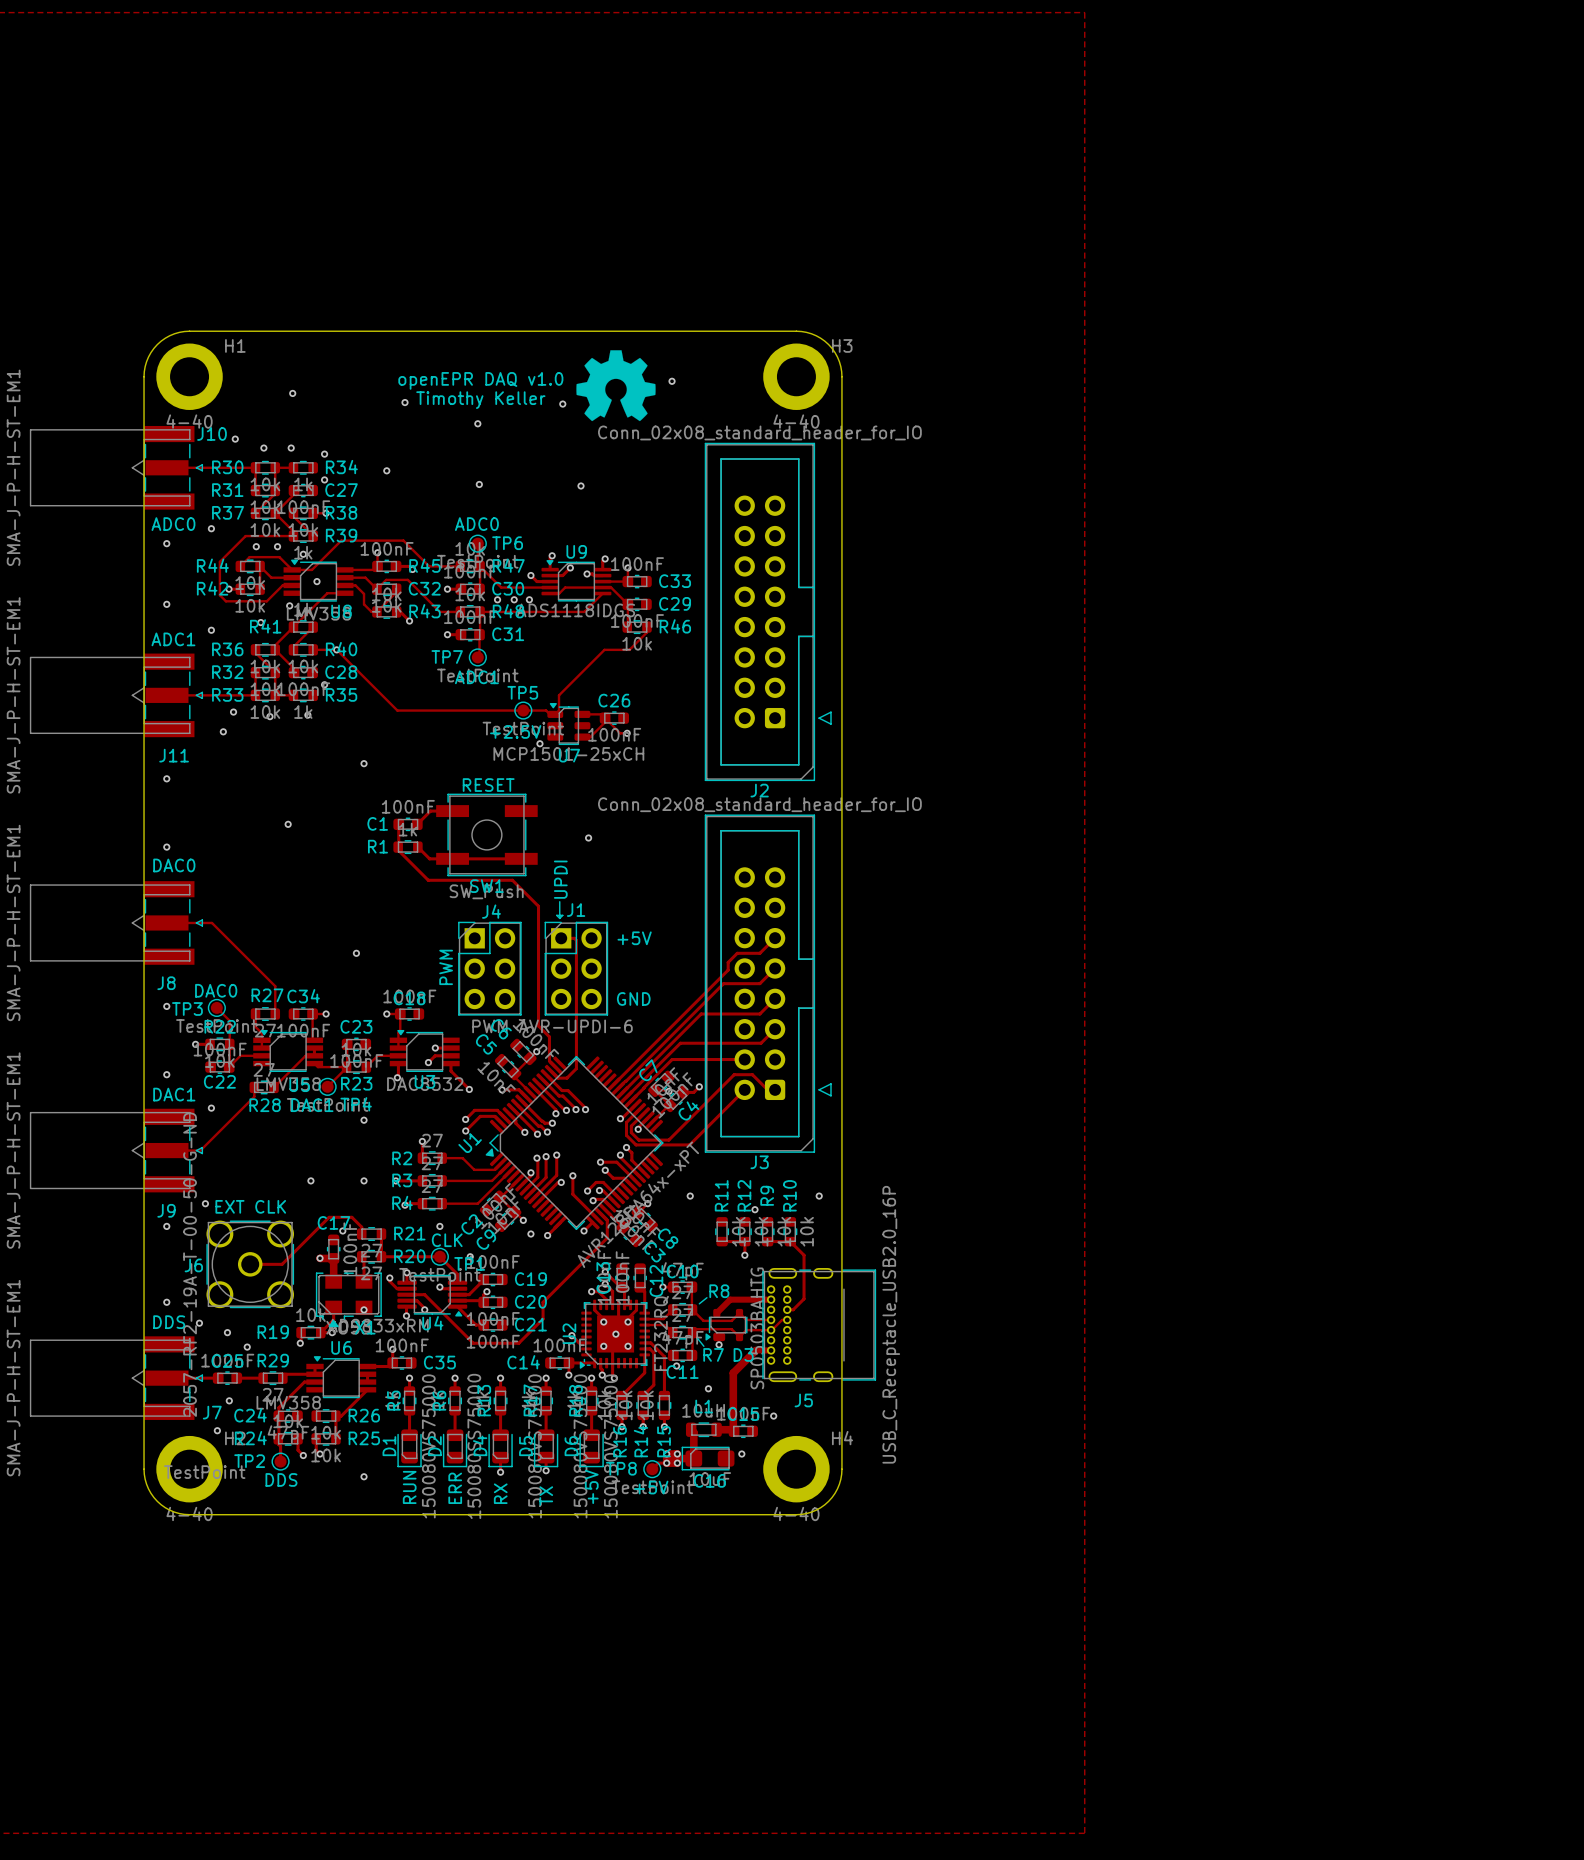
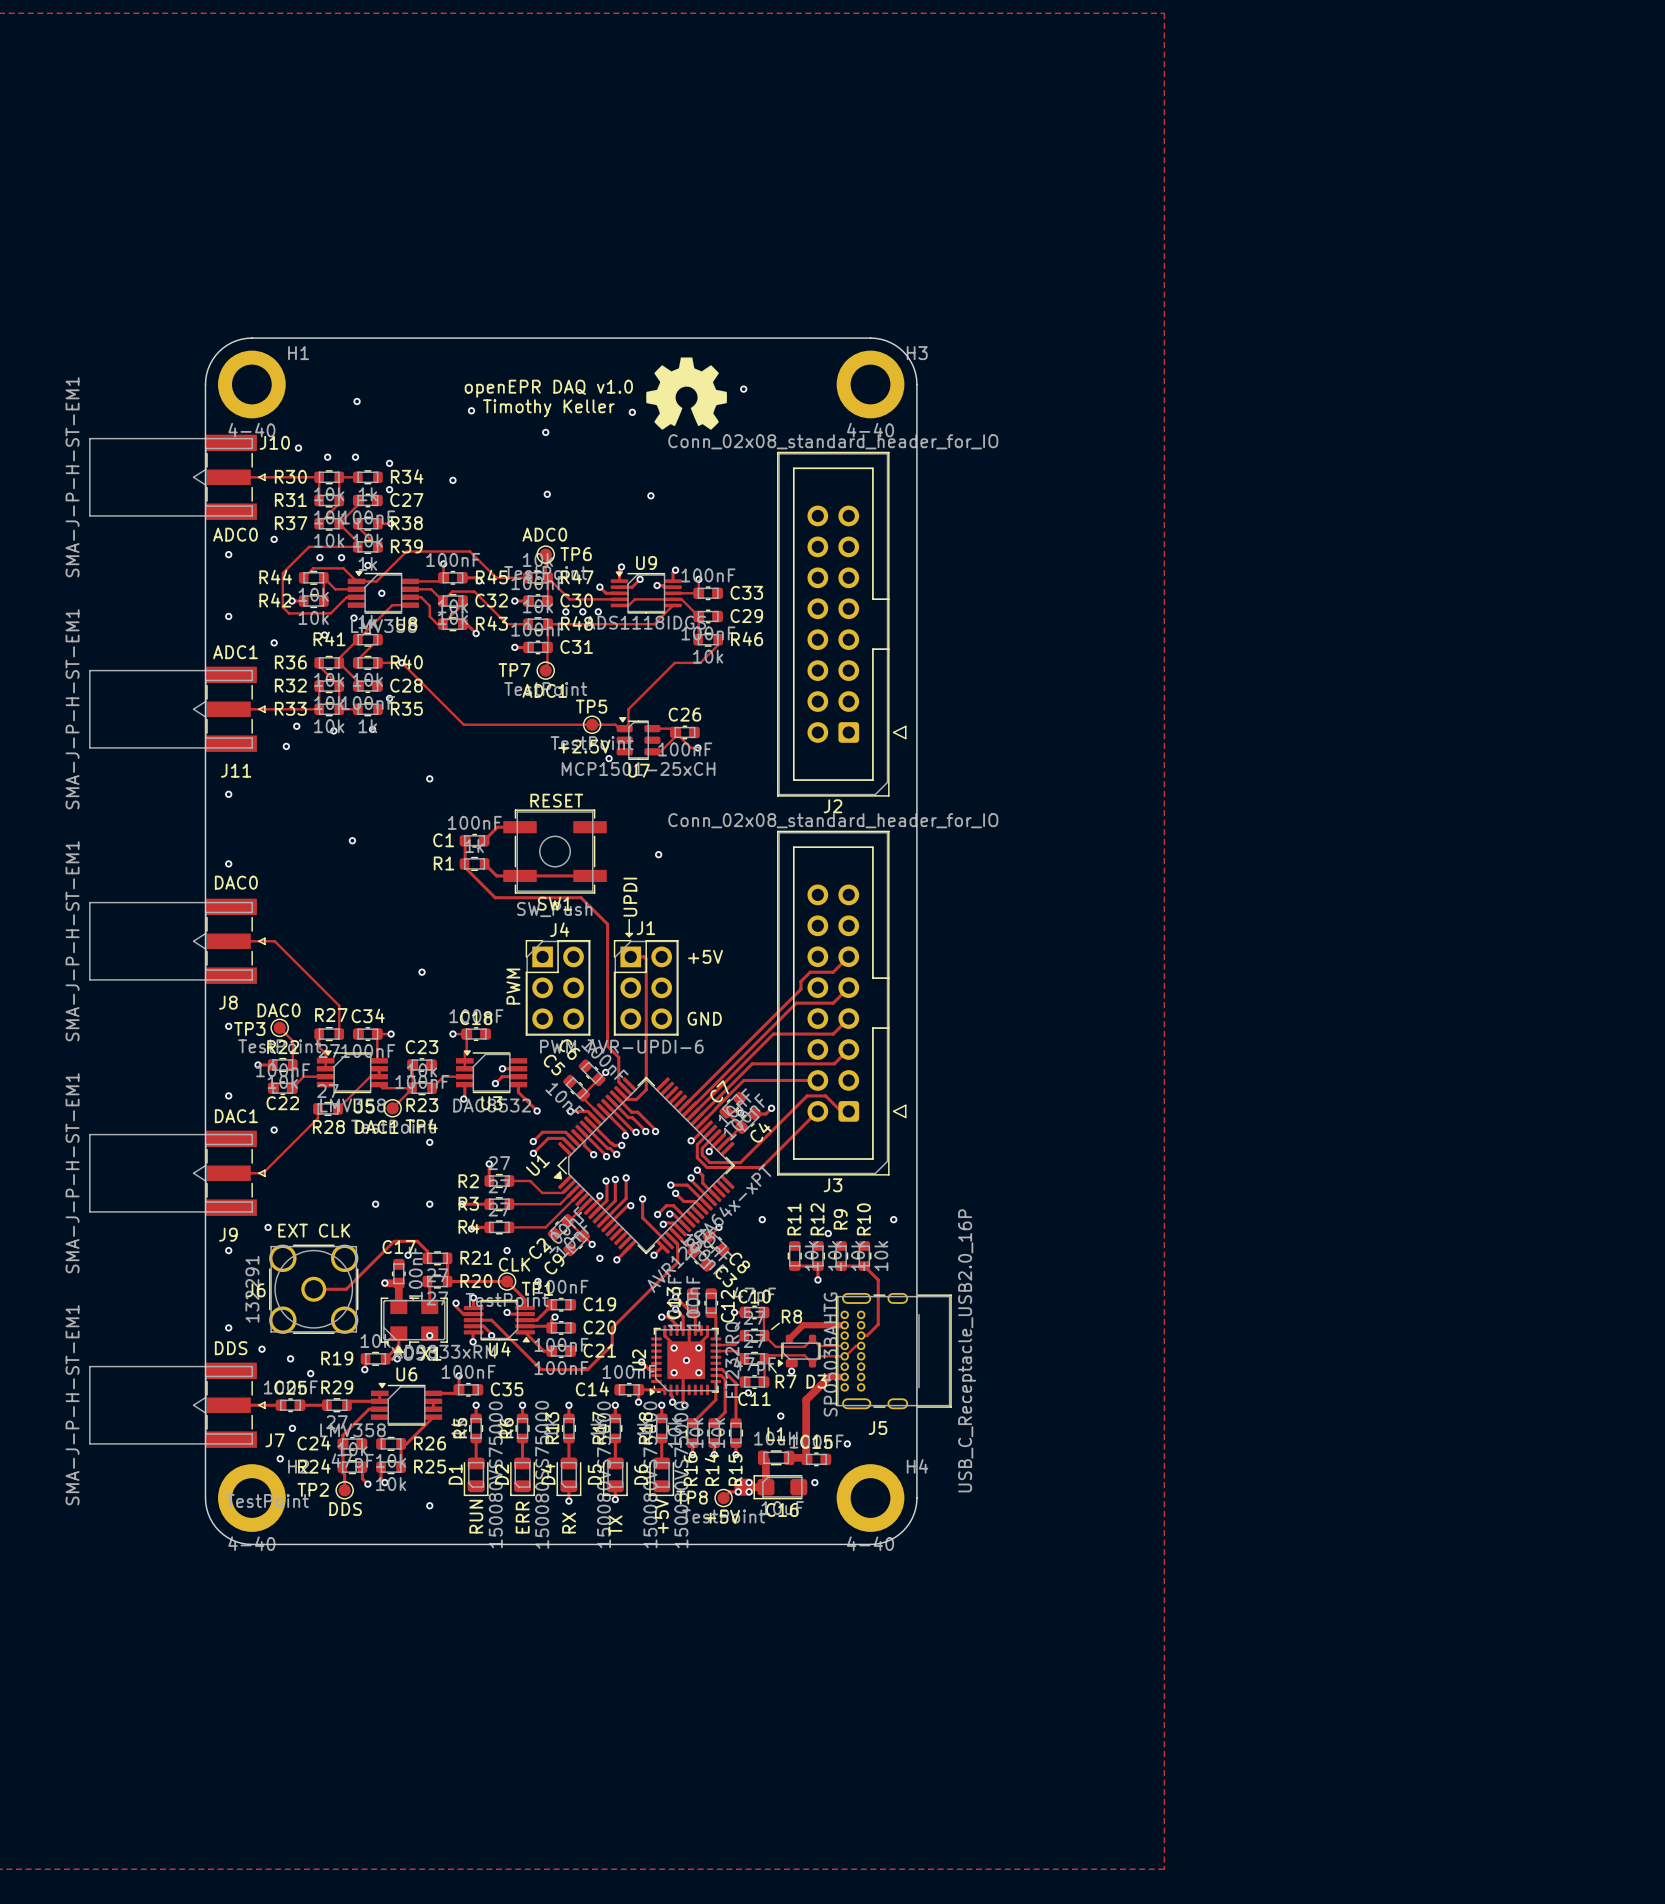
J6 value: 2057-RF2-19A-T-00-50-G-ND (190, 1264) -> 132291 (252, 1289)

